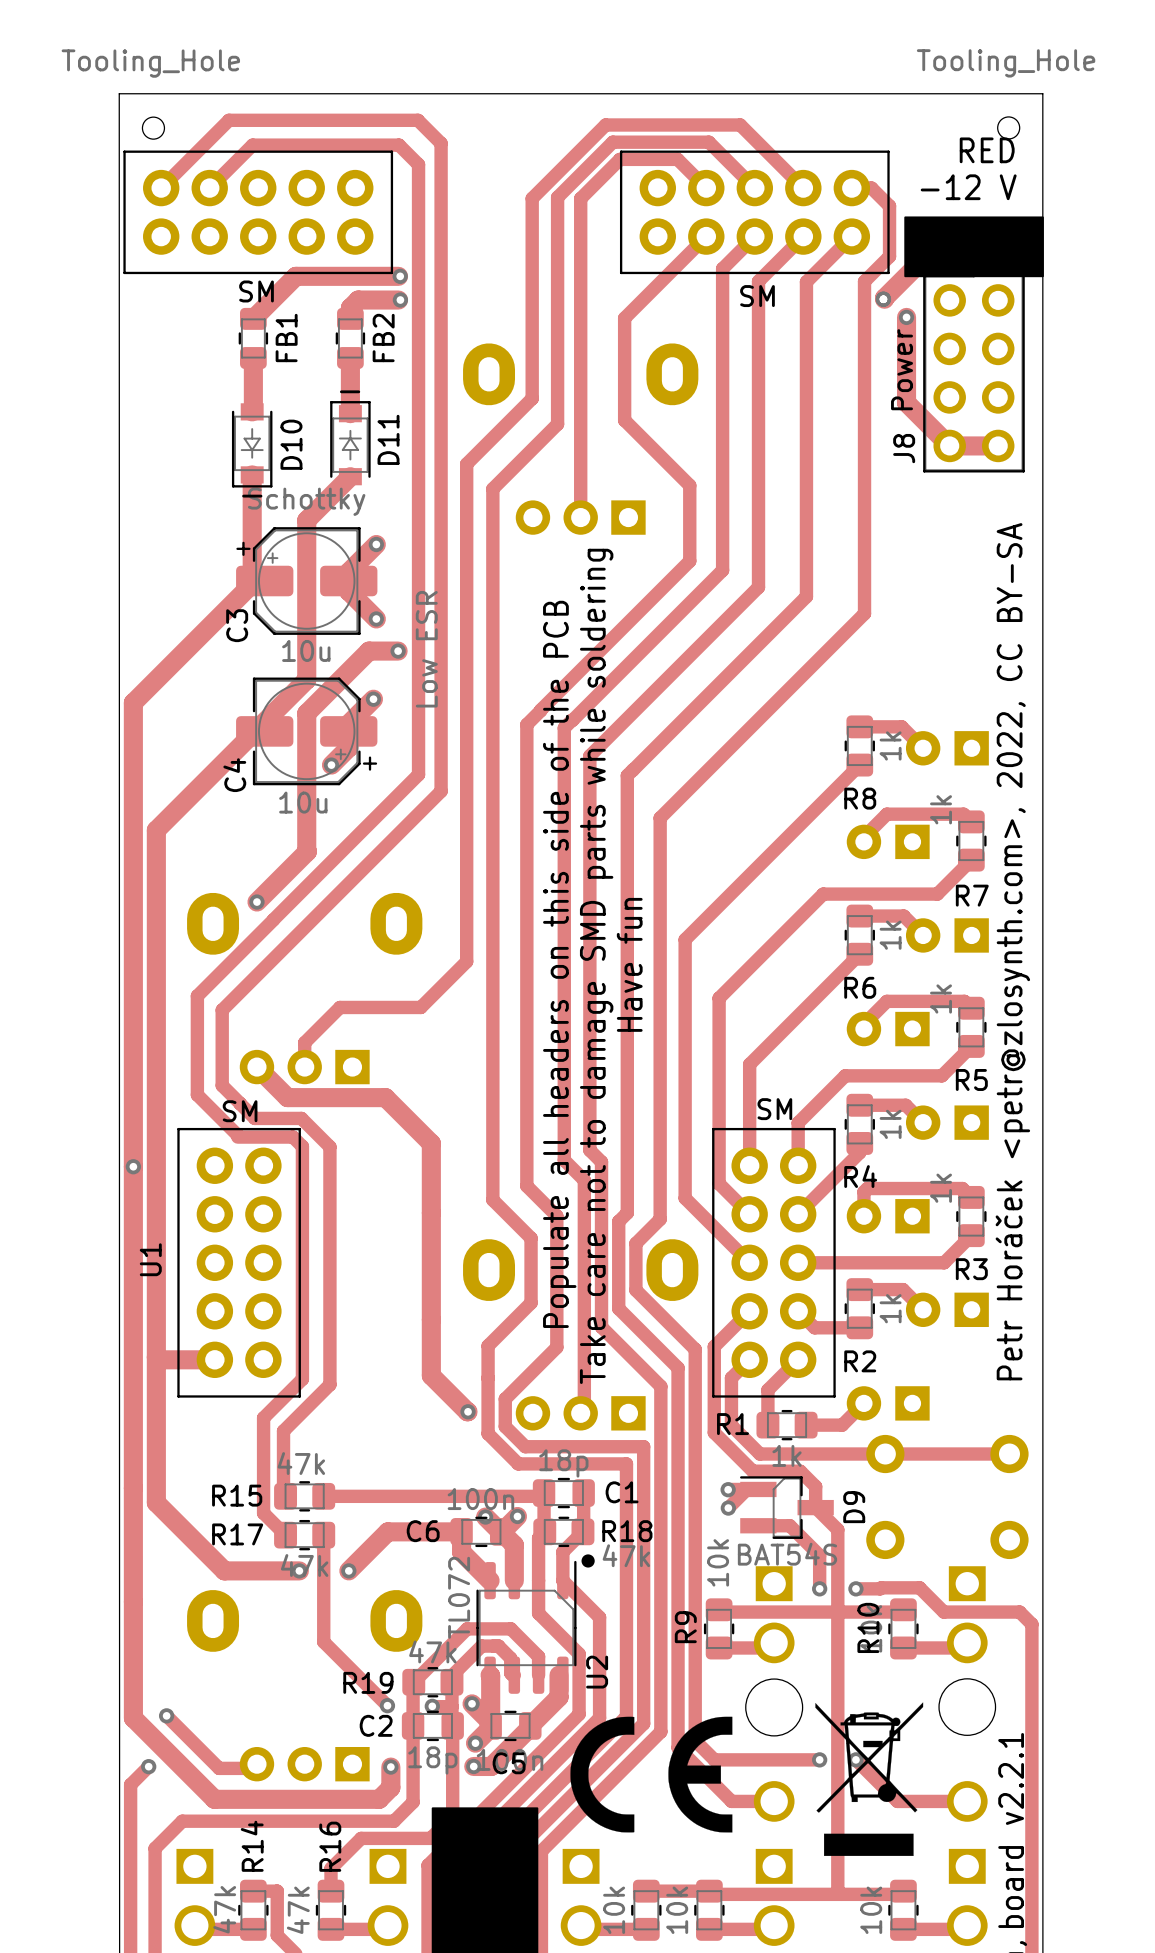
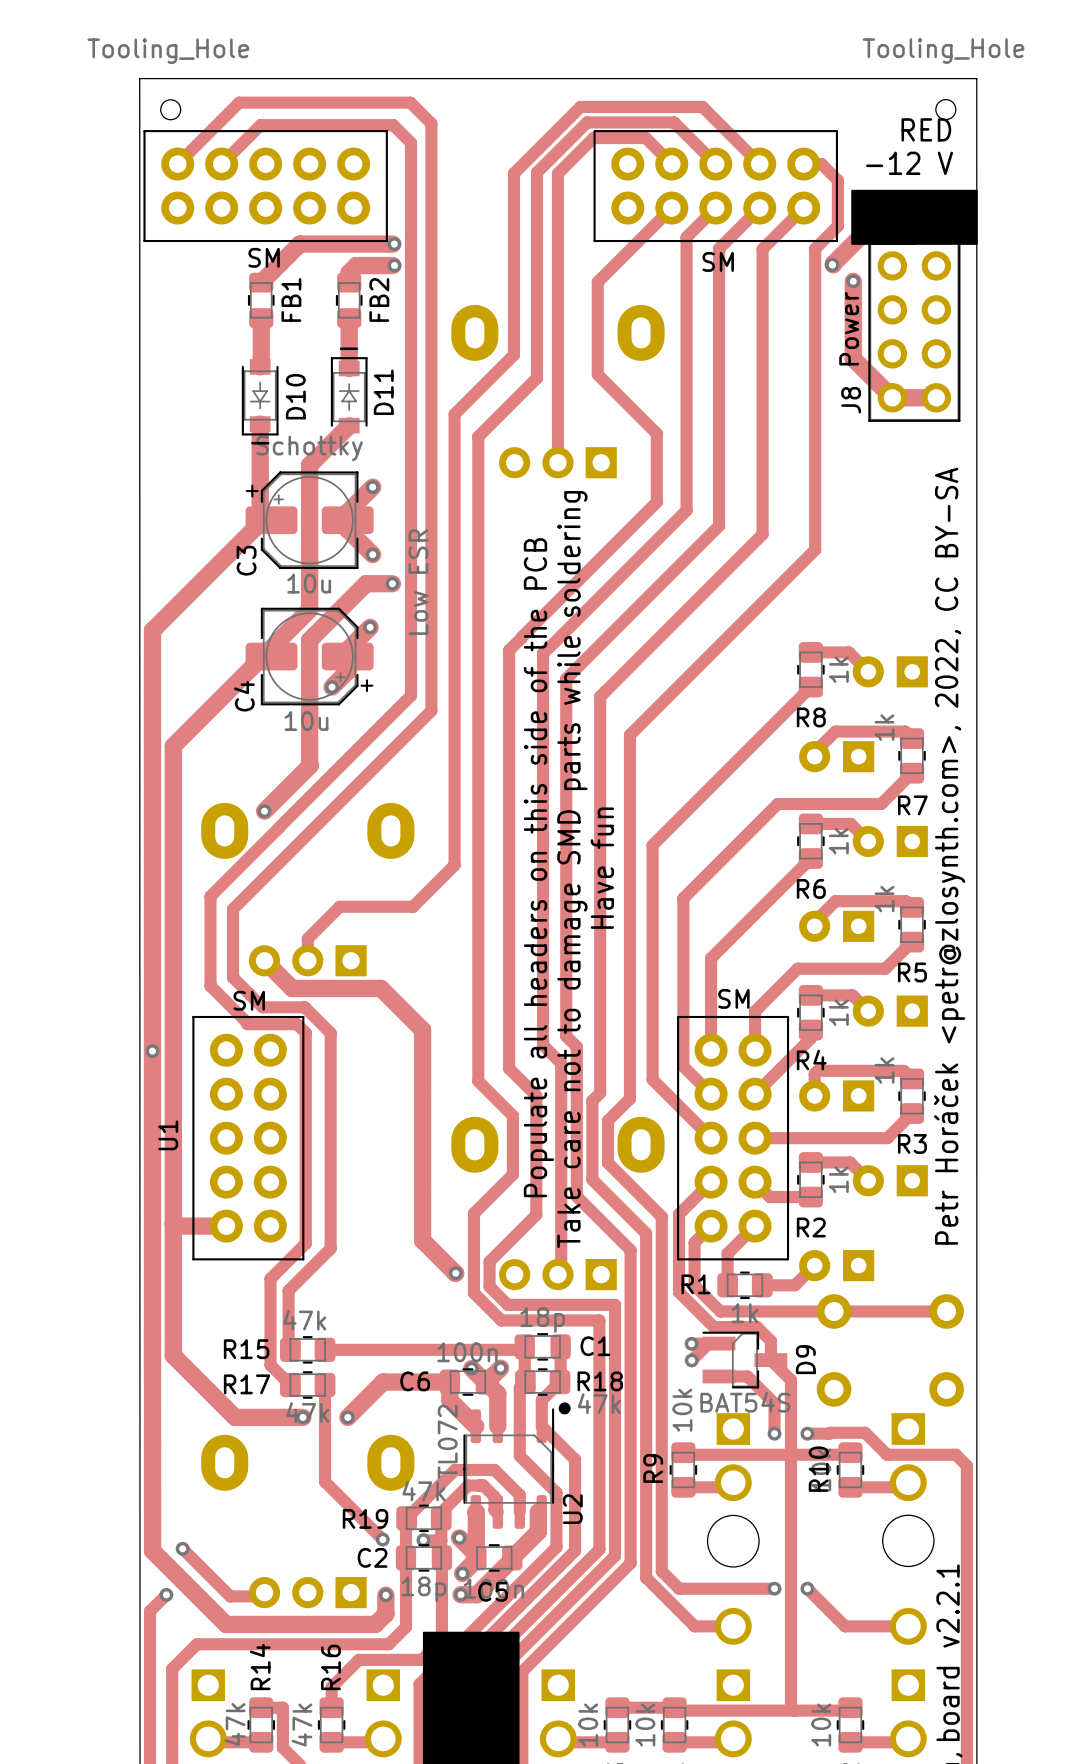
drawing: [815, 1702, 924, 1856] -> none
drawing: [570, 1716, 733, 1833] -> none

